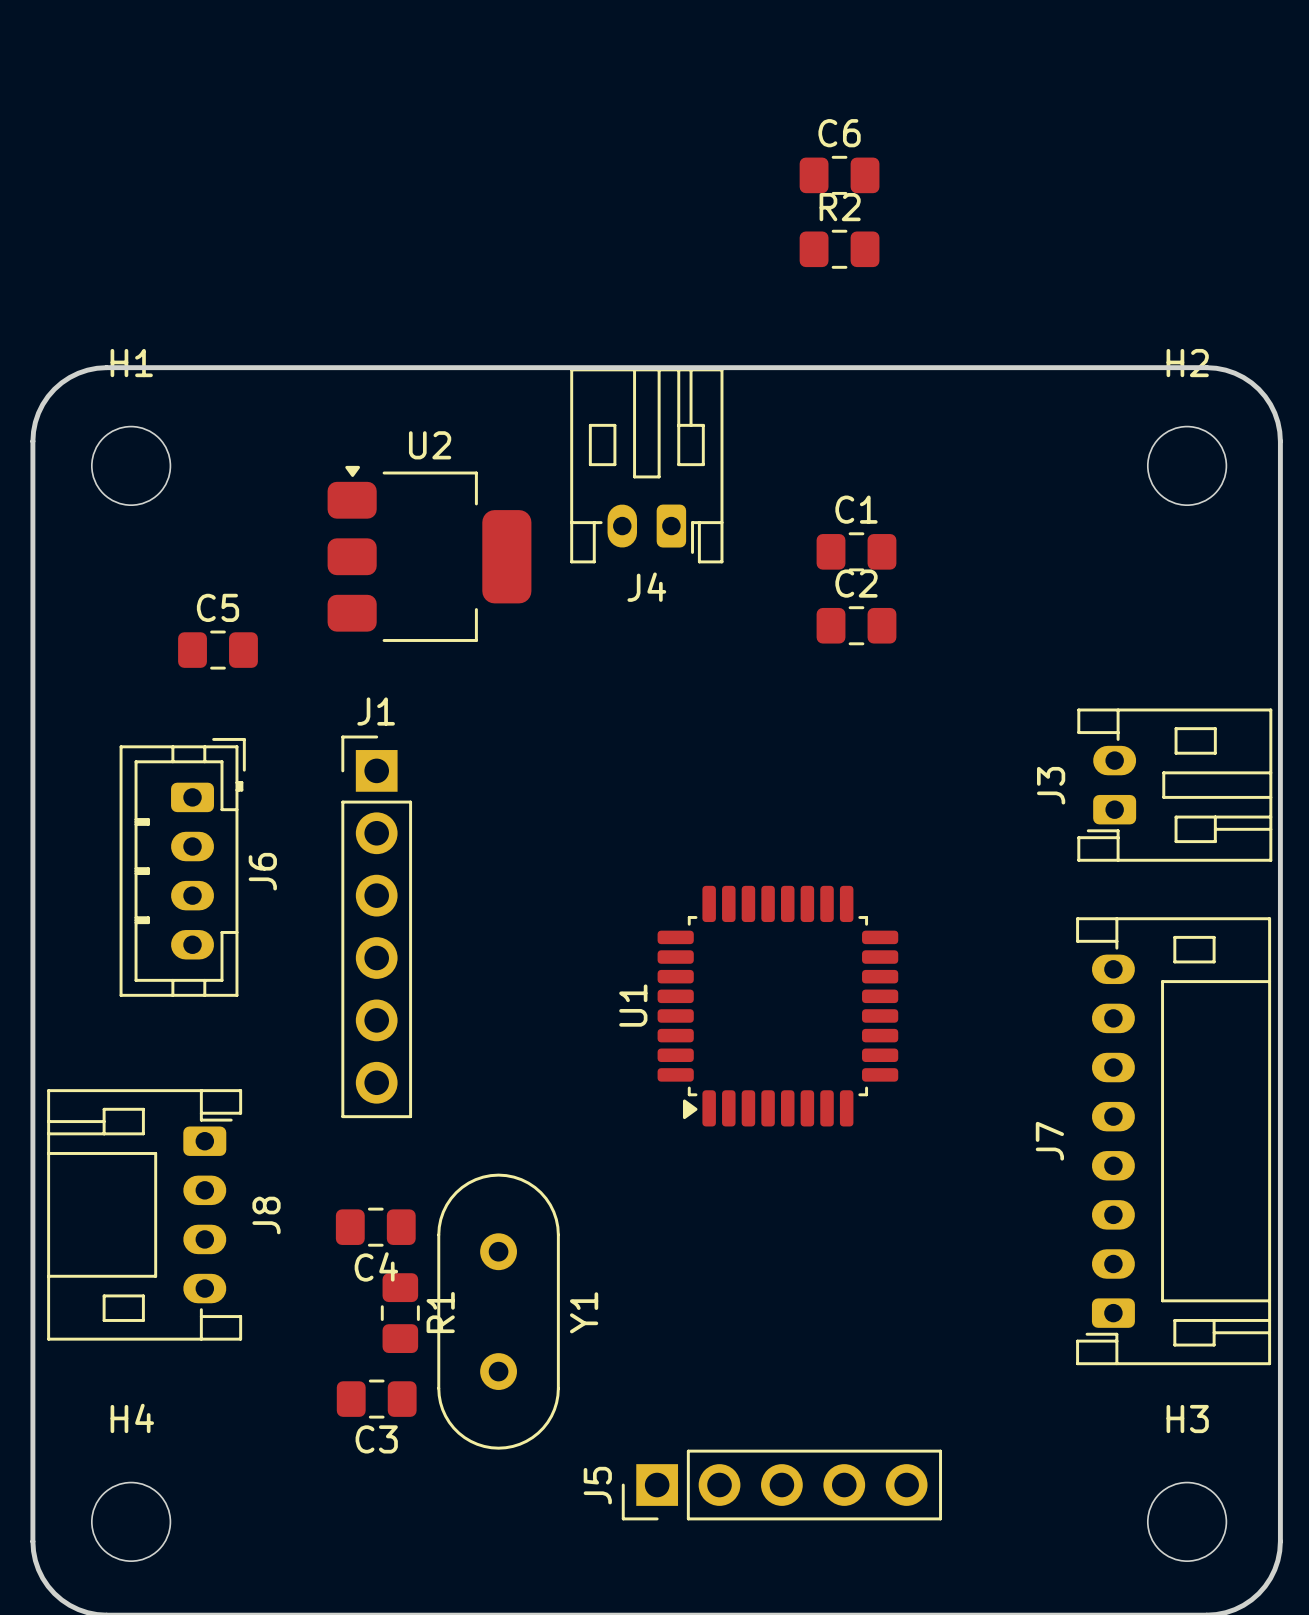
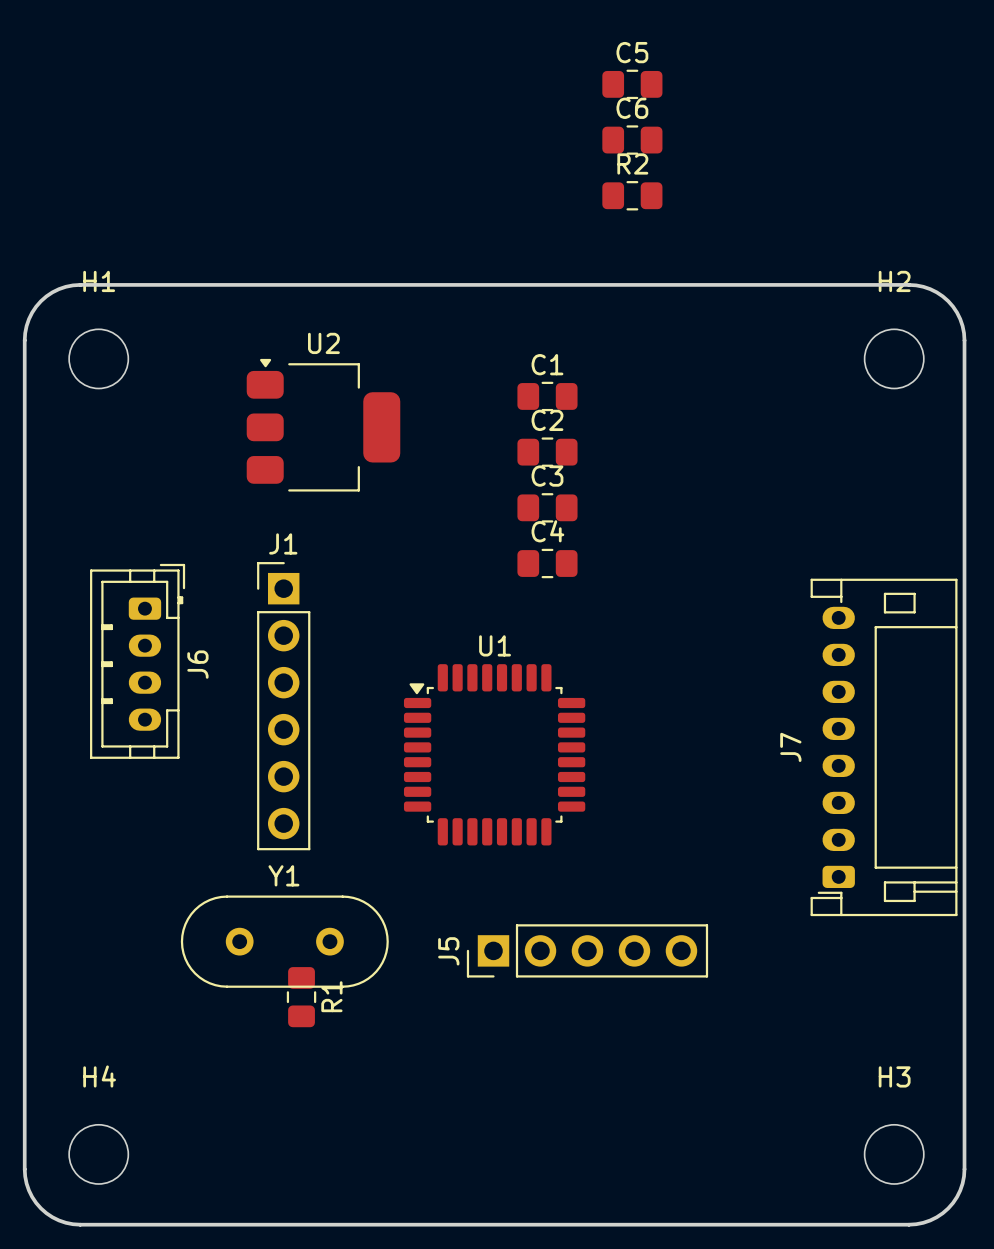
J4: (646, 465) -> none
C1 position: (856, 551) -> (547, 396)
C2 position: (856, 625) -> (547, 452)
C5 position: (218, 650) -> (632, 84)
J3: (1174, 785) -> none
U1 rotation: 0° (777, 1006) -> 90° clockwise (494, 754)
J7 position: (1173, 1141) -> (884, 747)
J8: (144, 1214) -> none
C4 position: (375, 1227) -> (547, 563)
C4 name position: C4 (376, 1266) -> C4 (547, 531)
Y1 rotation: 0° (498, 1311) -> 90° counterclockwise (284, 941)
C3 position: (376, 1399) -> (547, 507)
C3 name position: C3 (376, 1439) -> C3 (547, 476)
J5 position: (781, 1485) -> (587, 950)

